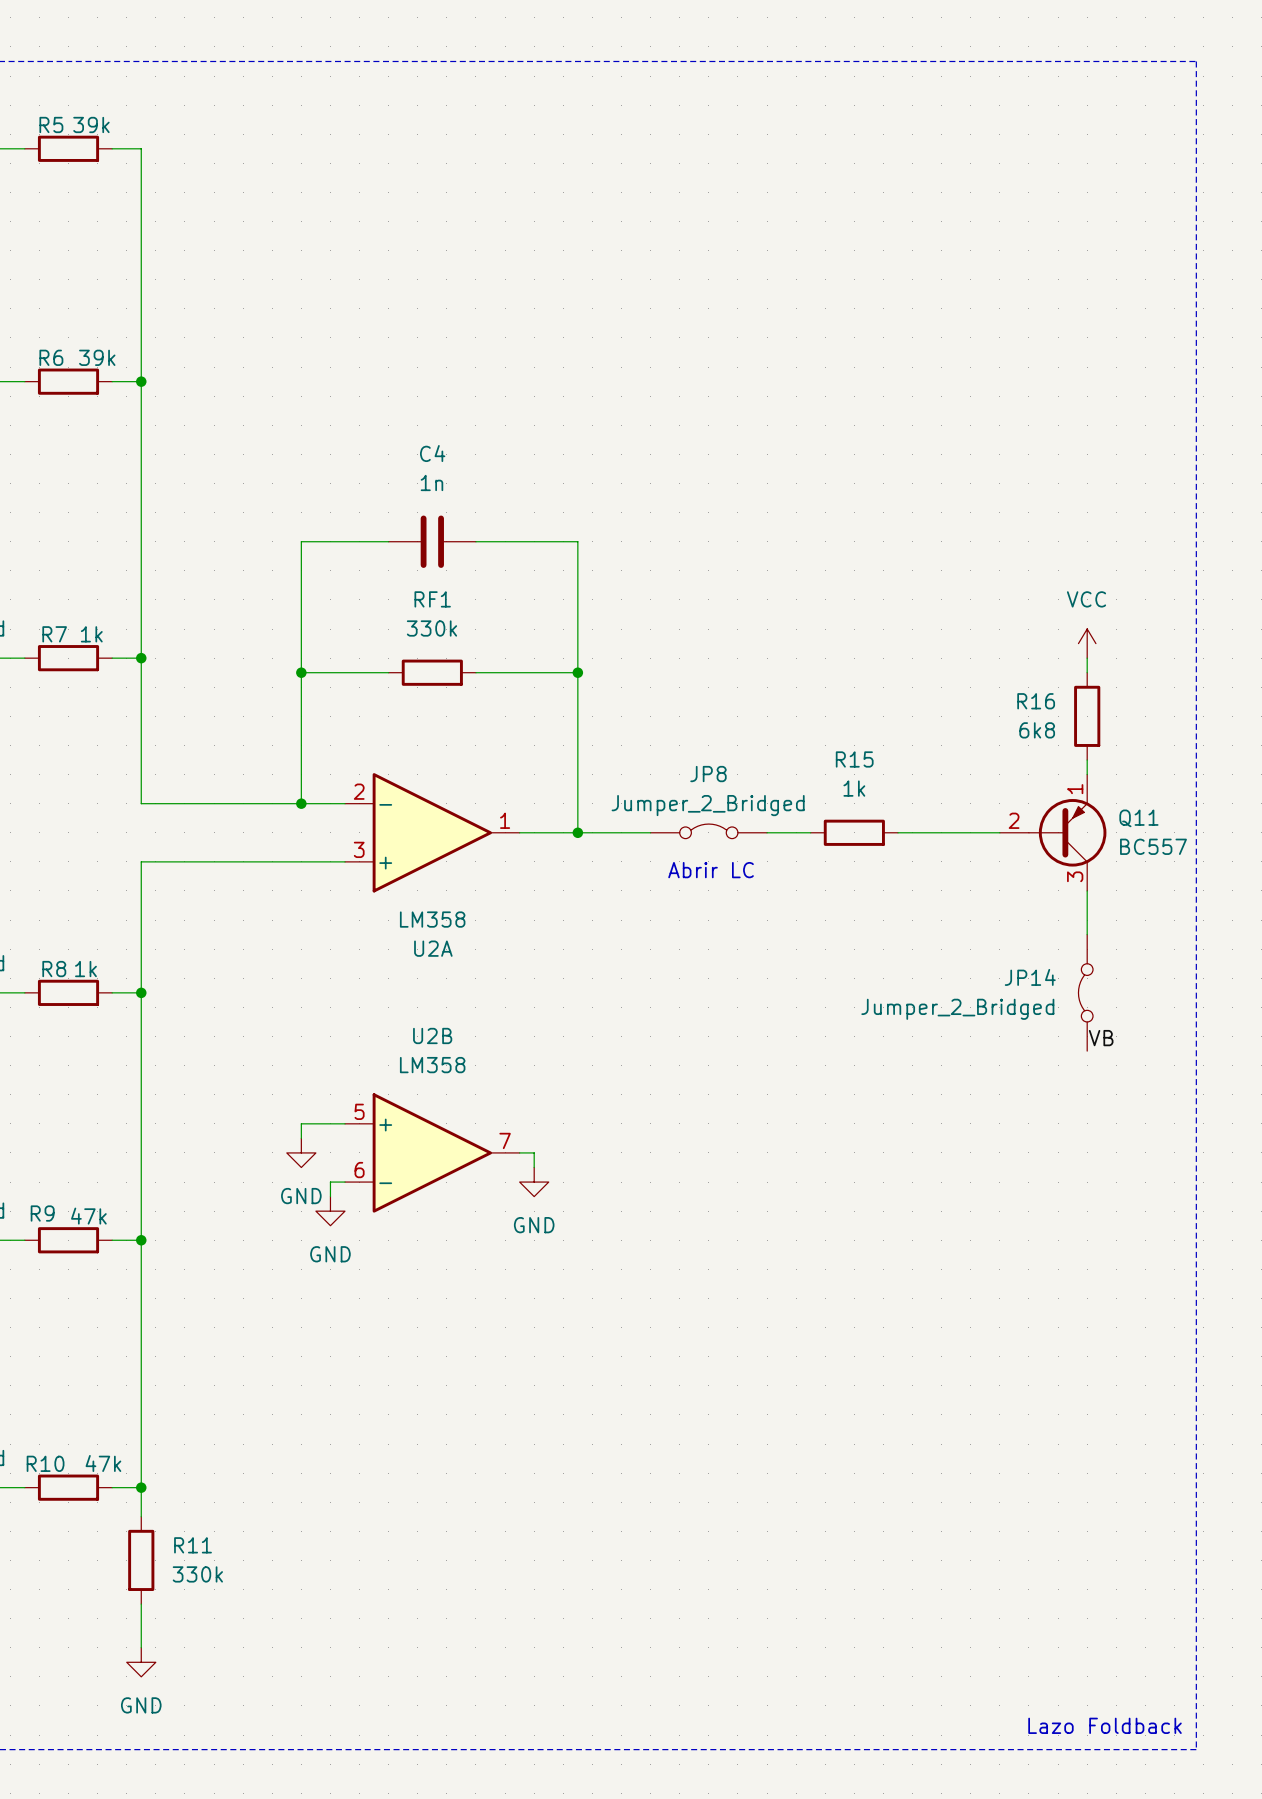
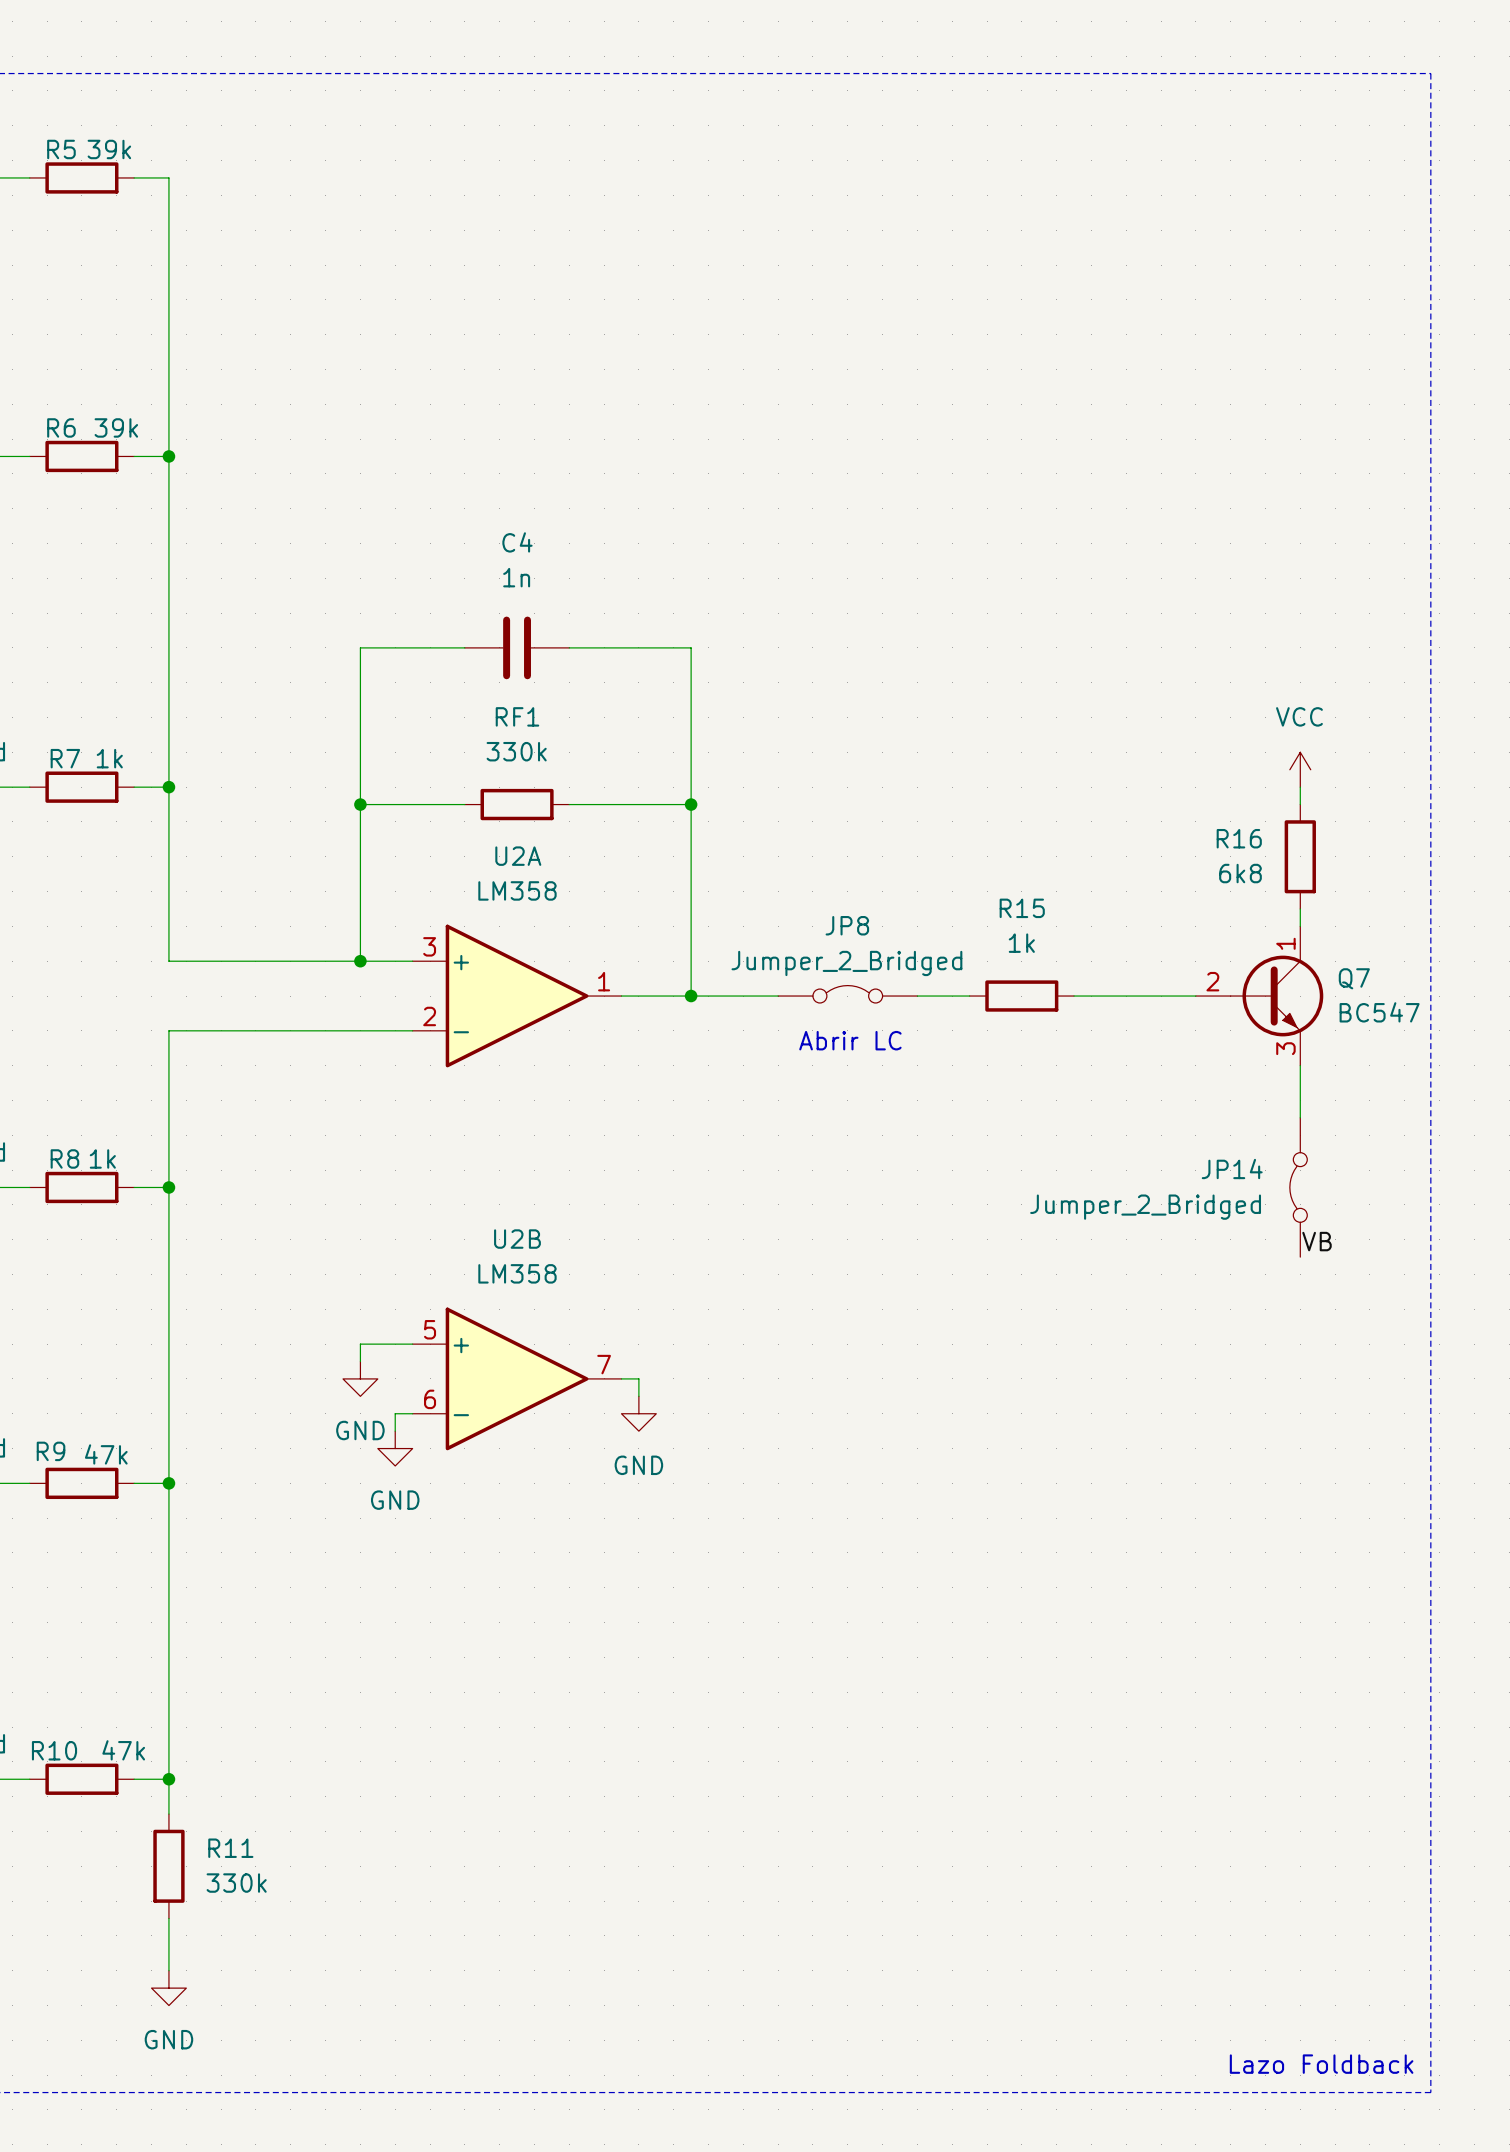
U2A flip: as is (432, 832) -> up-down (517, 996)
Q11: BC557 (1053, 832) -> none
Q7: none -> BC547 (1259, 996)

